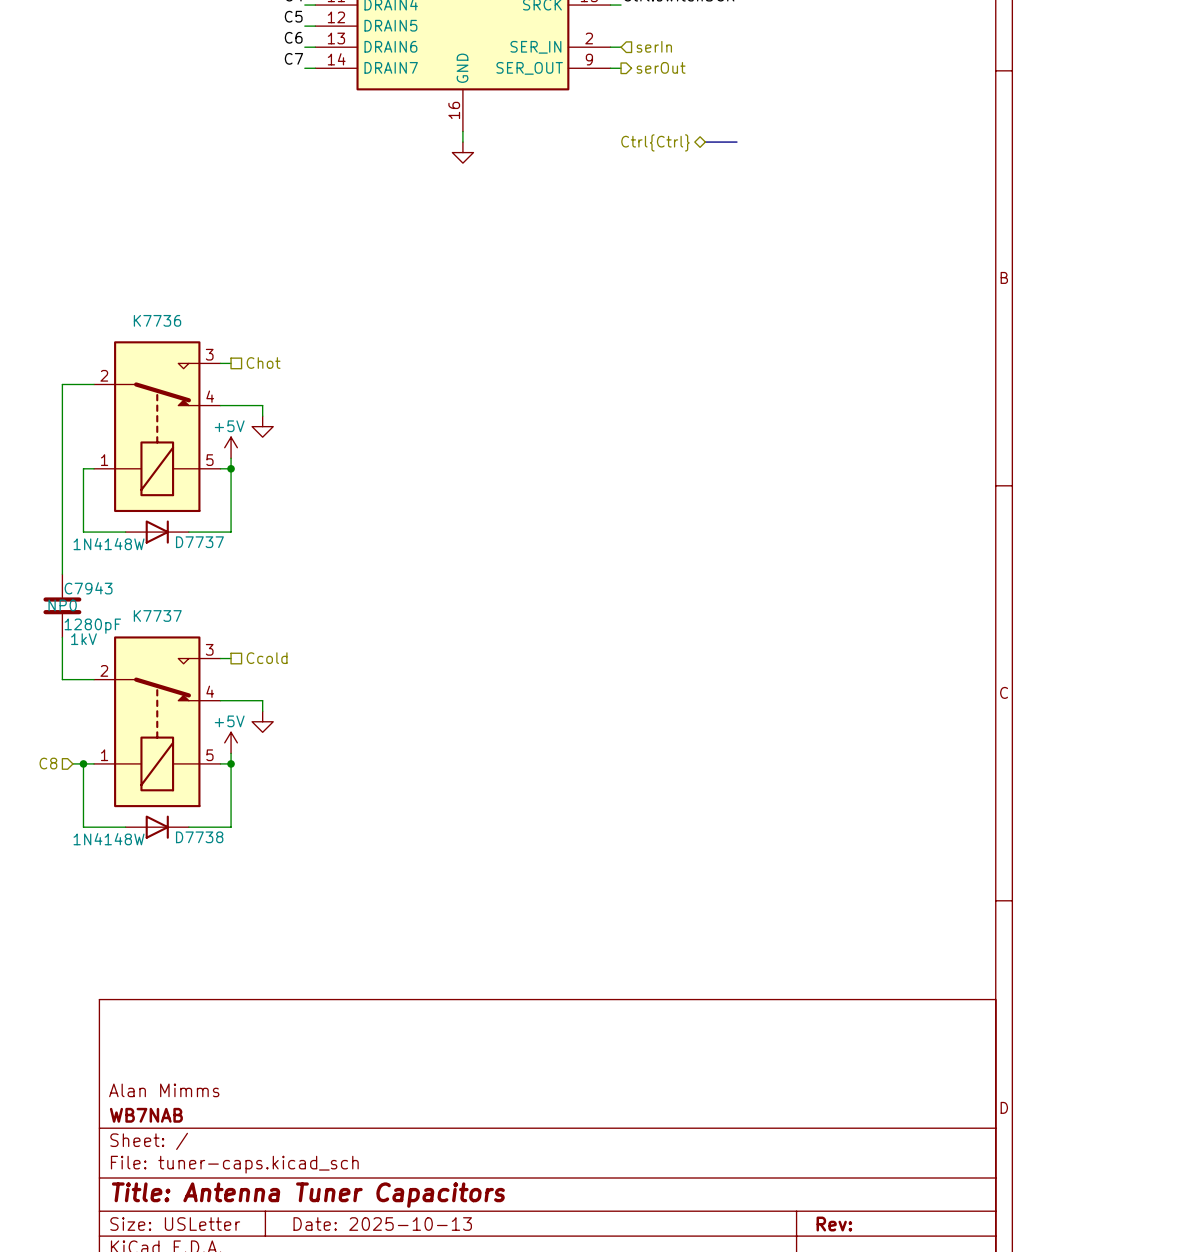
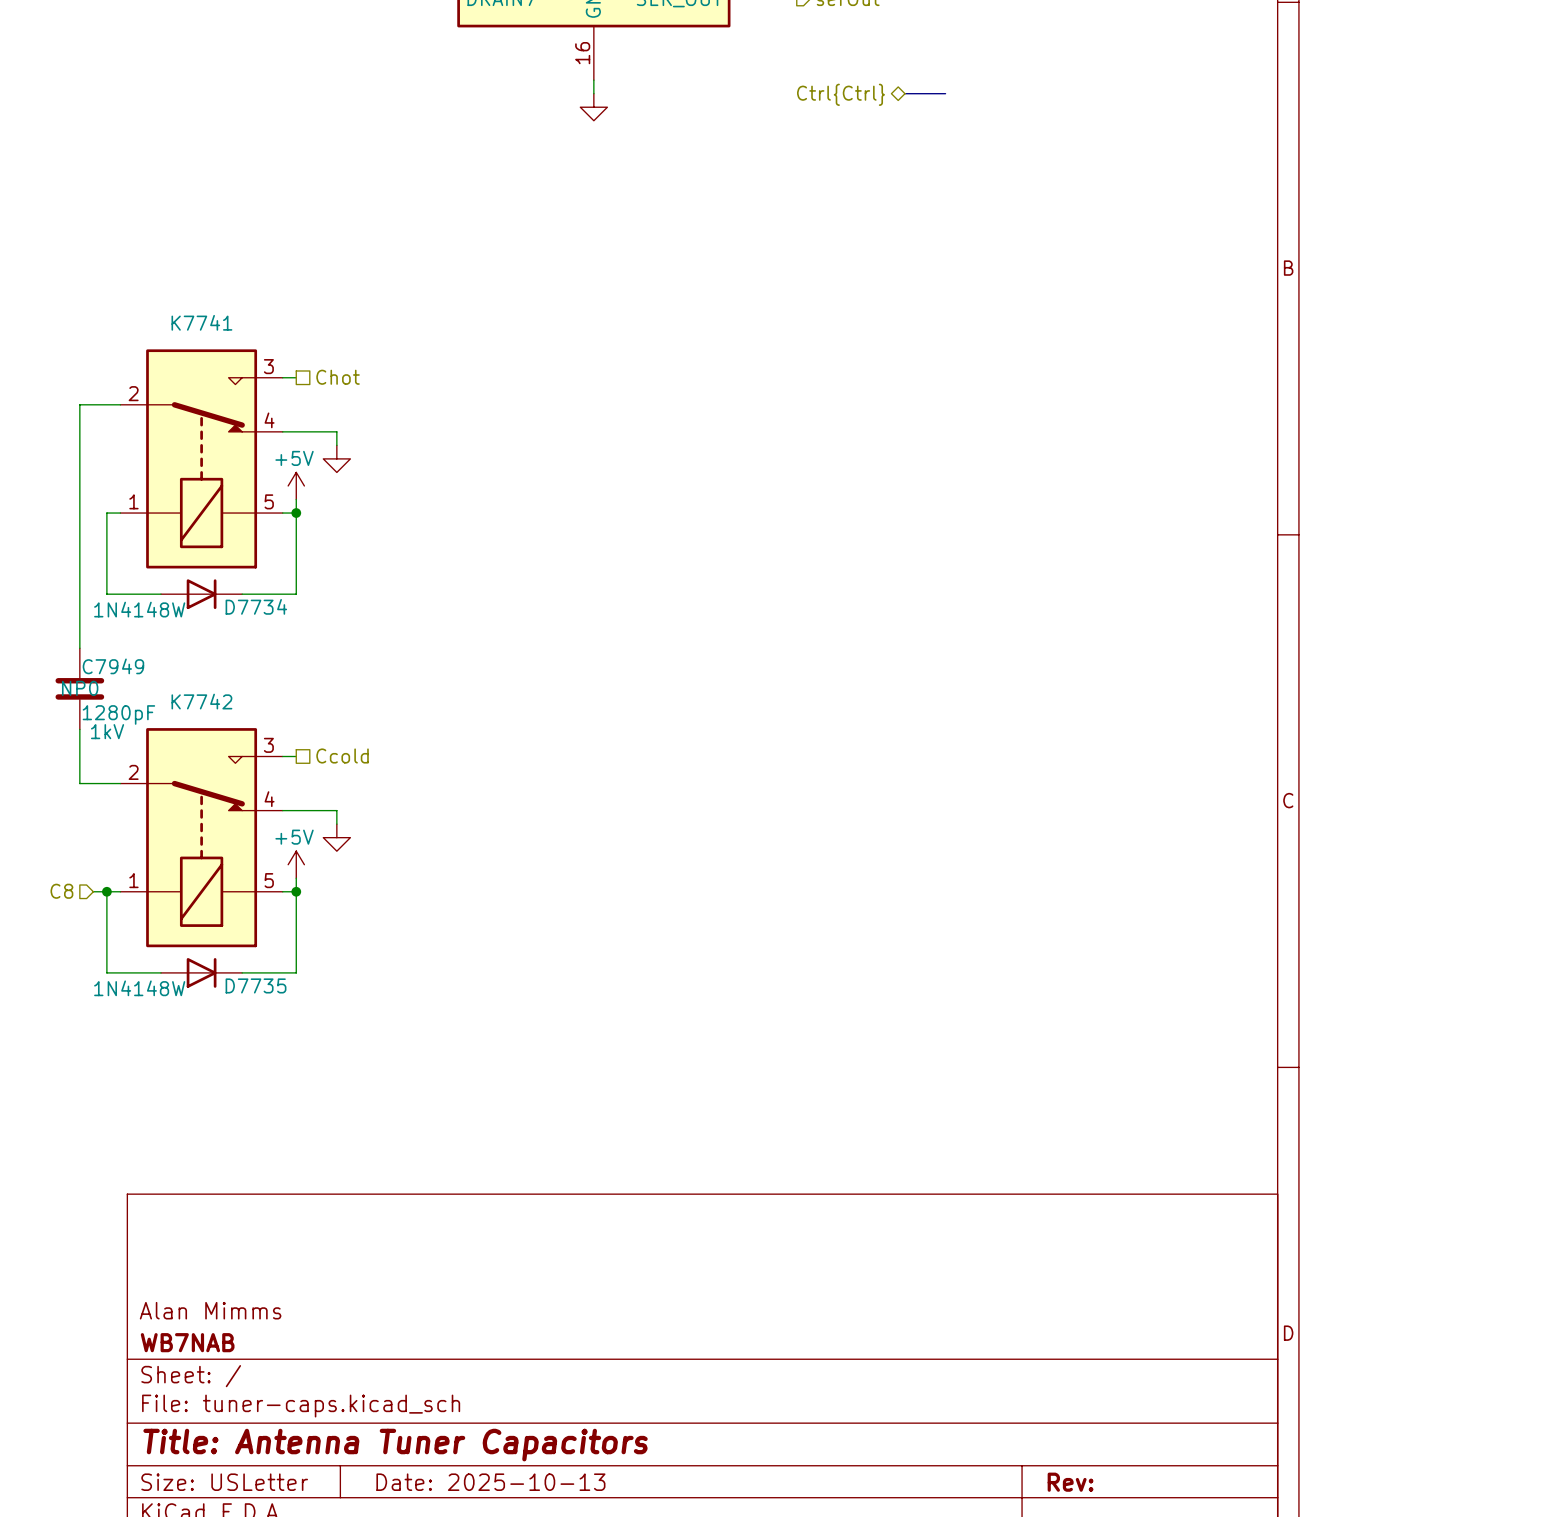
K7736 name: K7736 (157, 320) -> K7741 (201, 322)
D7737 name: D7737 (199, 542) -> D7734 (256, 606)
C7943 name: C7943 (88, 588) -> C7949 (113, 666)
K7737 name: K7737 (157, 615) -> K7742 (201, 701)
D7738 name: D7738 (199, 837) -> D7735 (256, 985)

